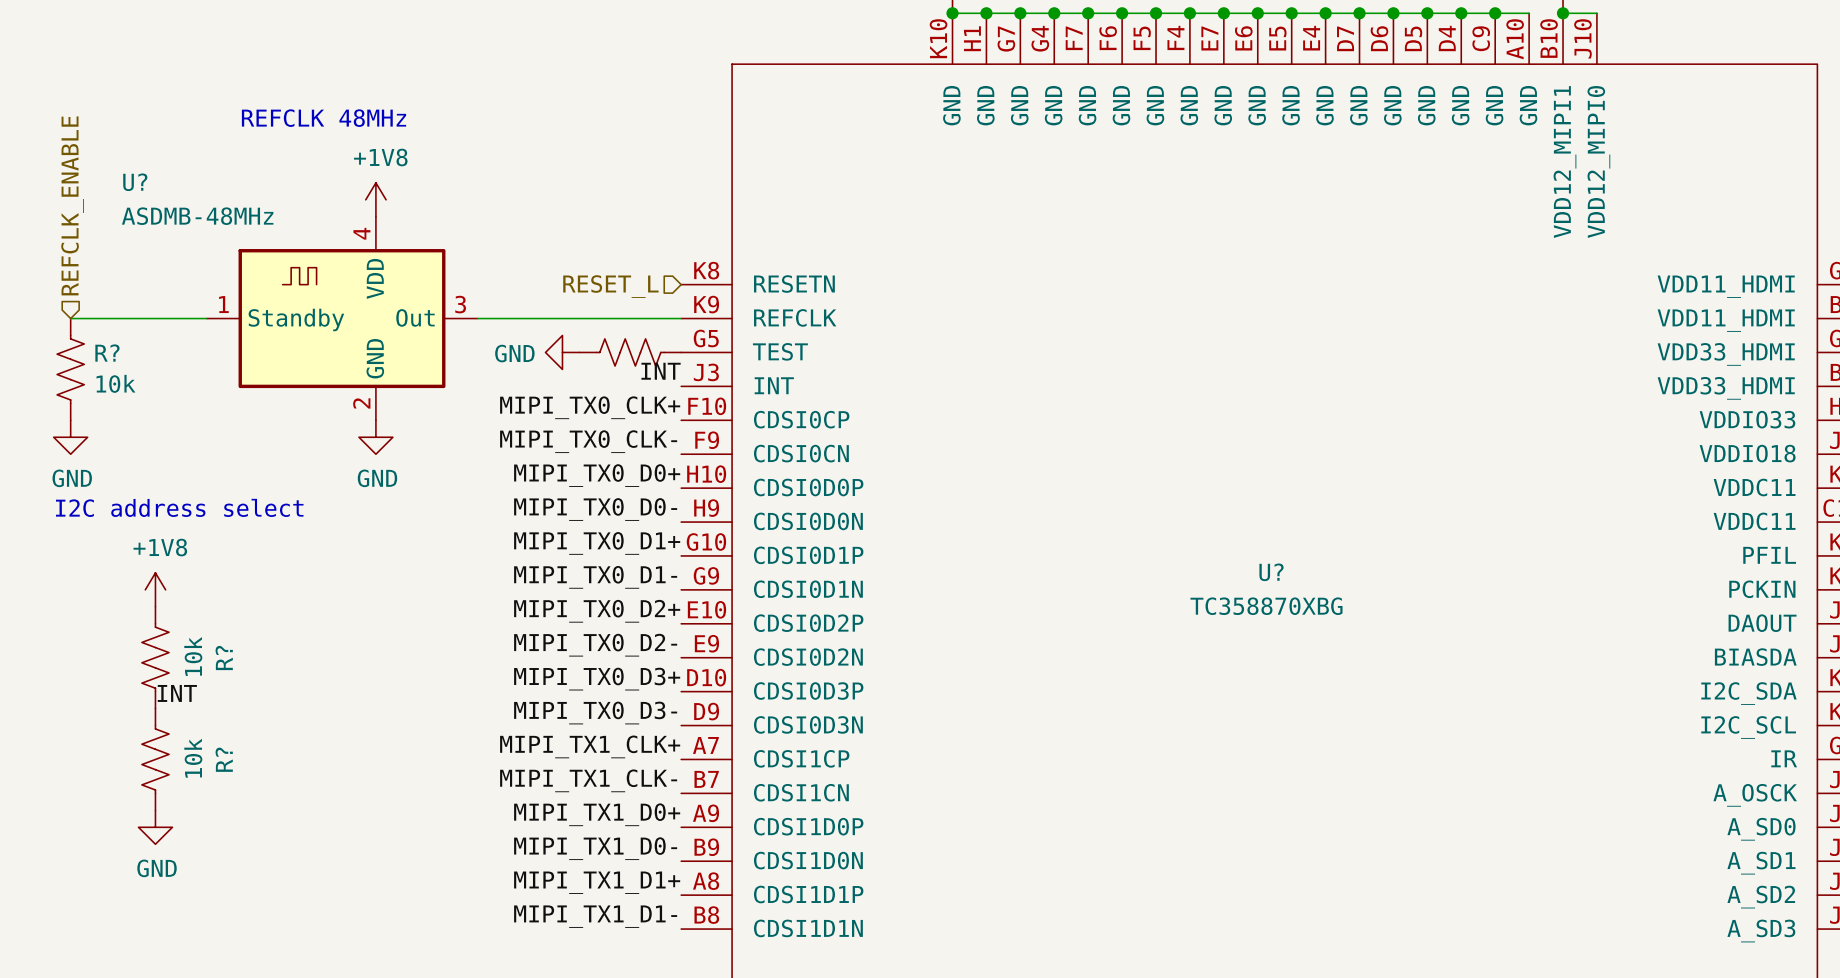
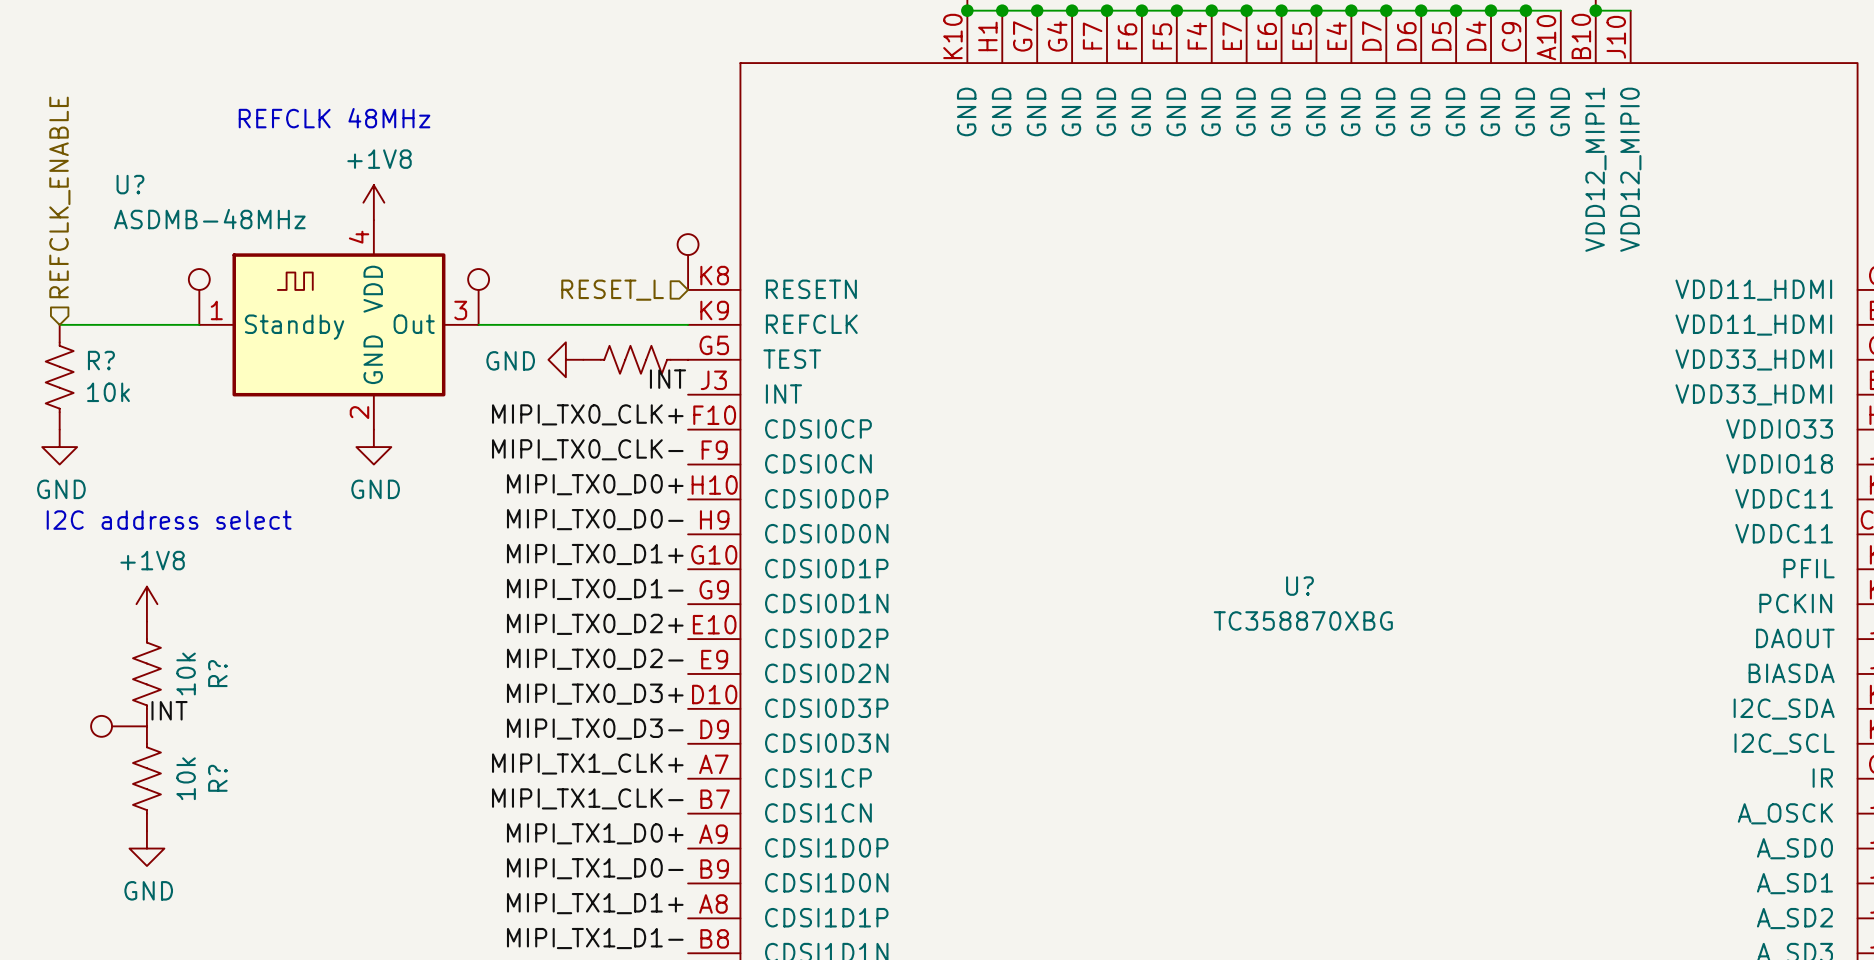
part: none -> (688, 262)
part: none -> (199, 296)
part: none -> (478, 296)
part: none -> (119, 726)

